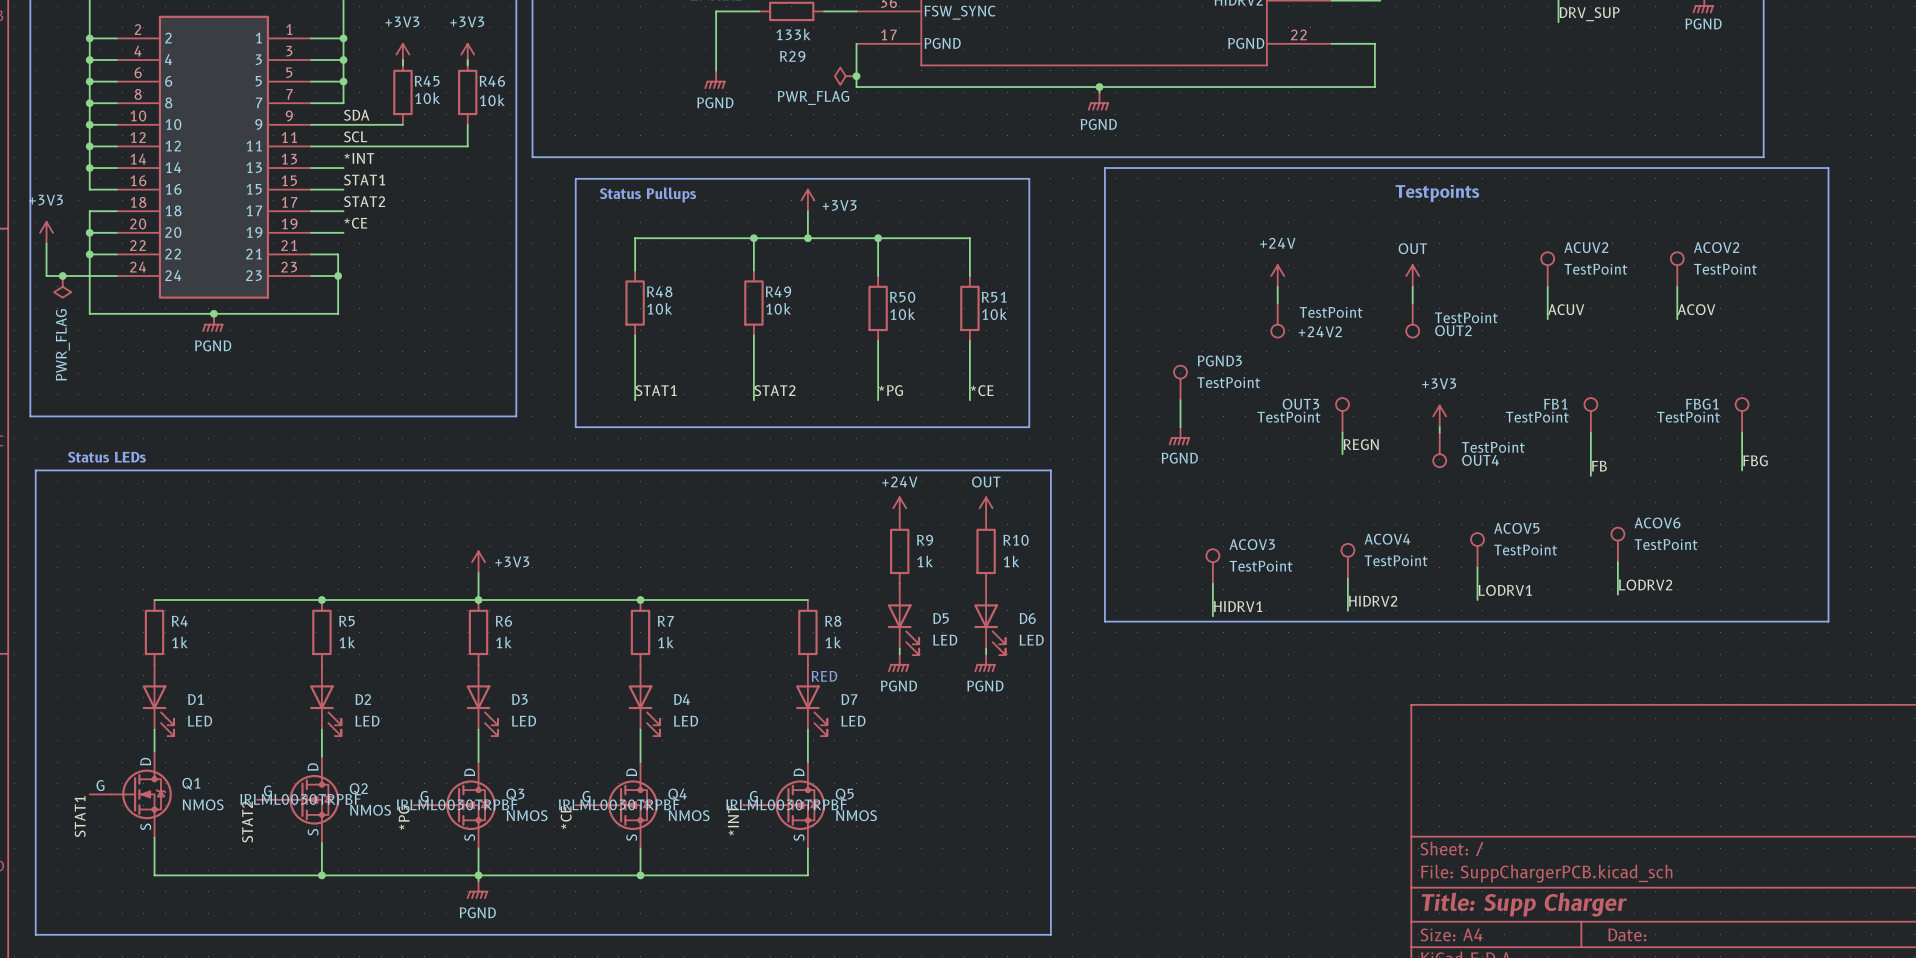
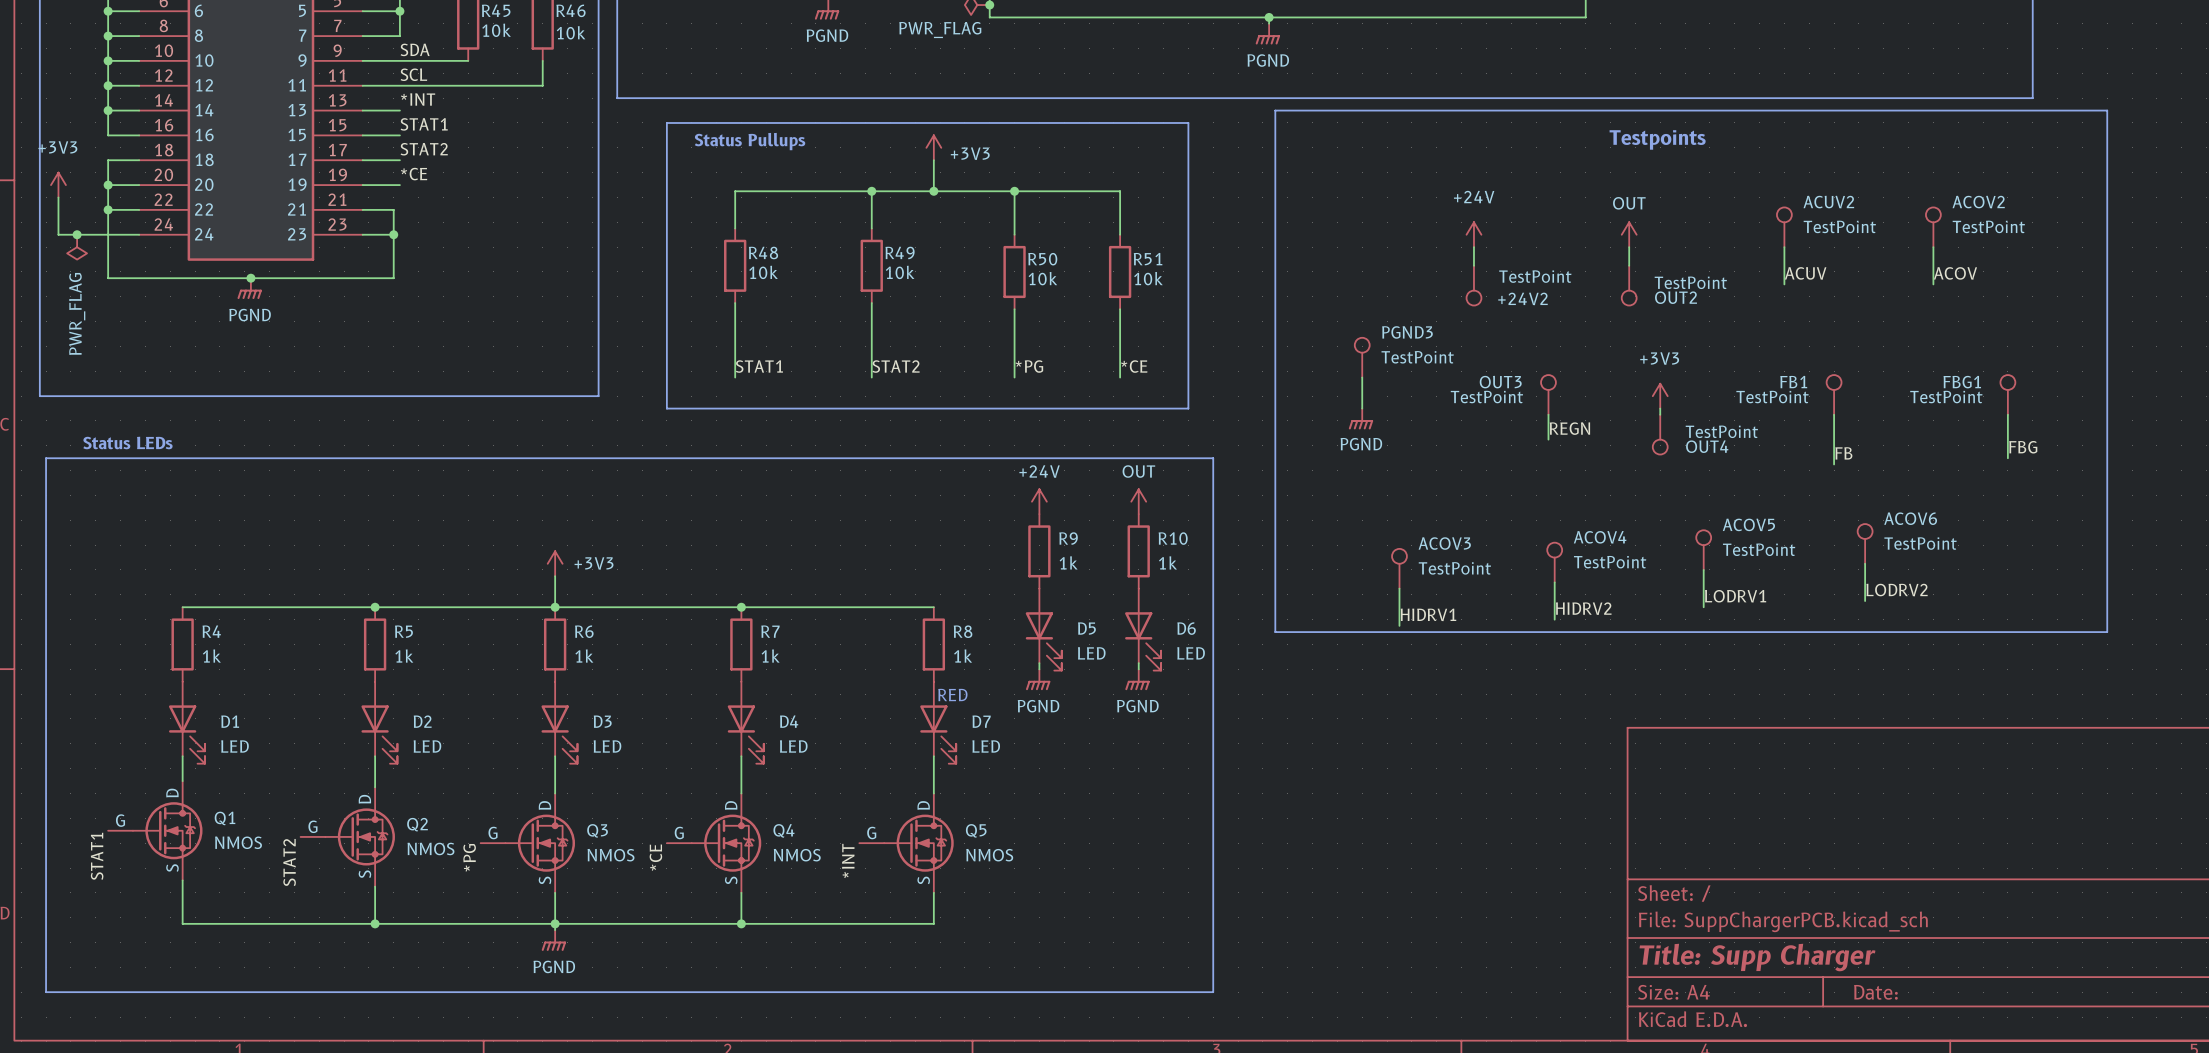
Q2 text: IRLML0030TRPBF (300, 799) -> none
Q3 text: IRLML0030TRPBF (457, 804) -> none
Q4 text: IRLML0030TRPBF (619, 804) -> none
Q5 text: IRLML0030TRPBF (786, 804) -> none

